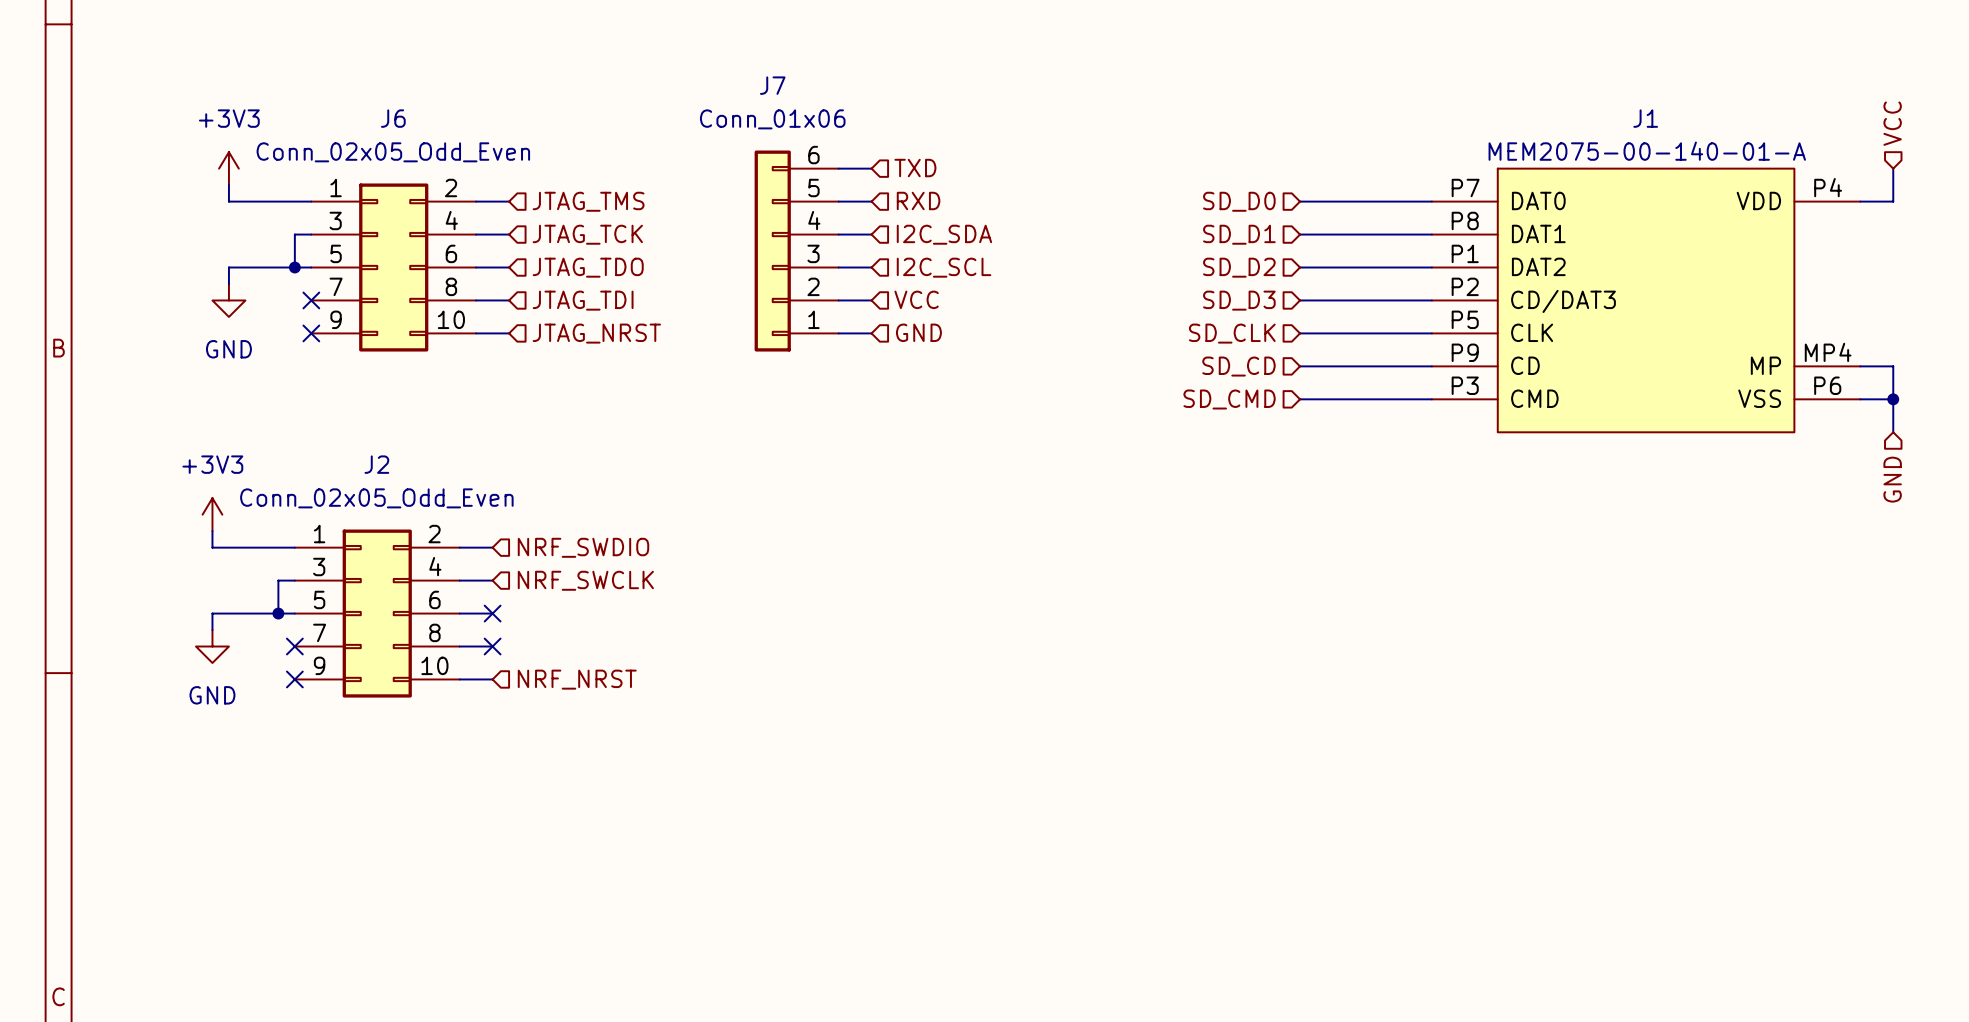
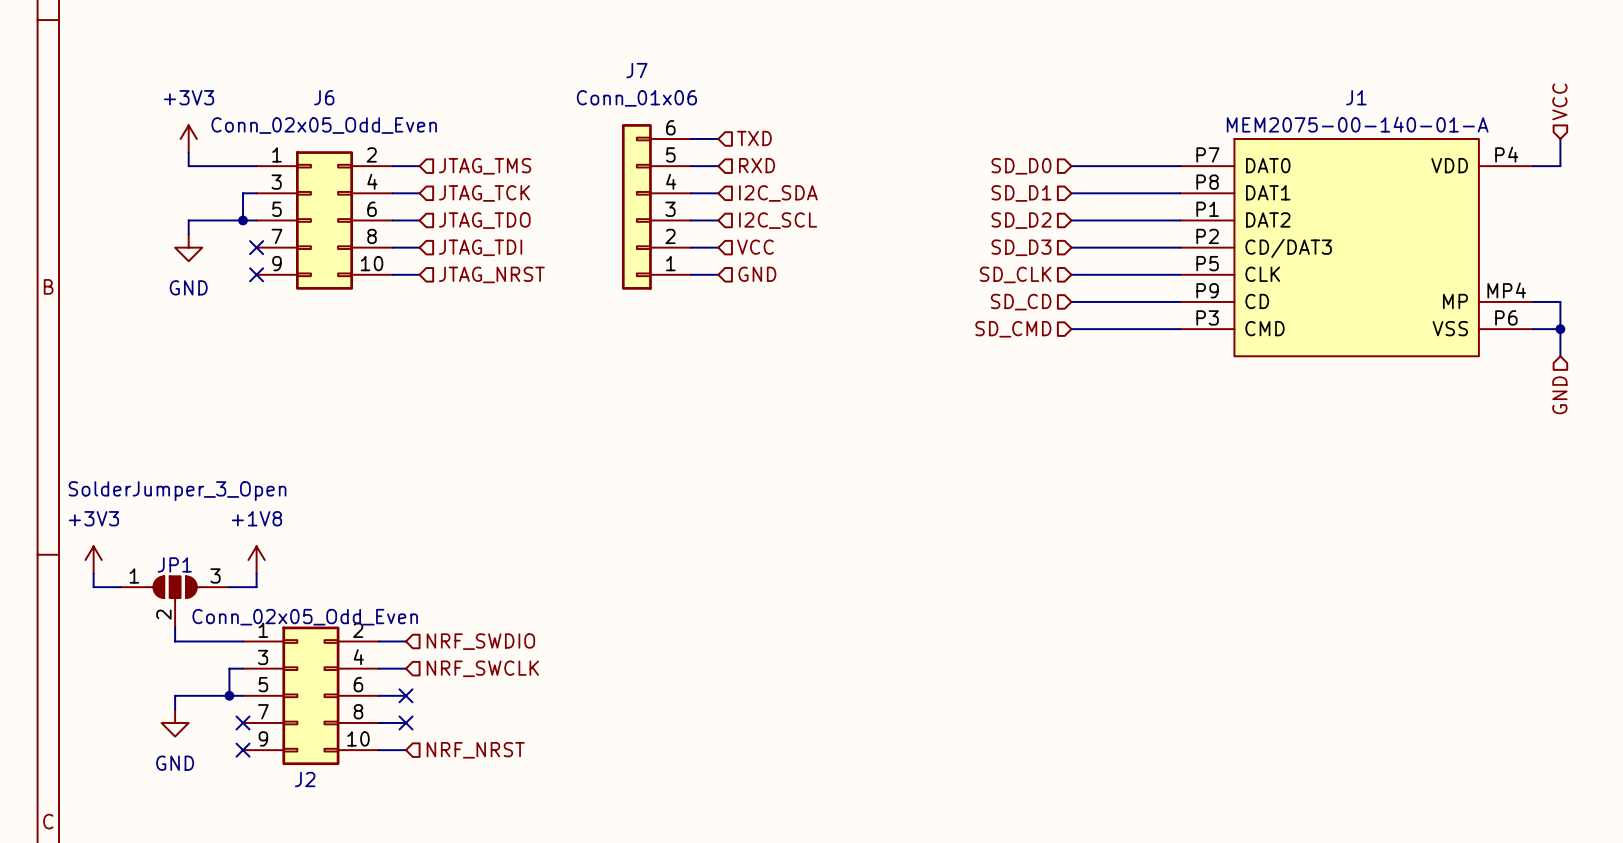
J2 name position: J2 (376, 464) -> J2 (305, 779)
J2 value position: Conn_02x05_Odd_Even (376, 498) -> Conn_02x05_Odd_Even (305, 617)
power symbol position: +3V3 (212, 514) -> +3V3 (93, 560)
wire: (212, 531) (212, 547) (294, 547) -> (175, 627) (175, 641) (243, 641)
wire: (459, 547) (492, 547) -> (378, 641) (406, 641)
hierarchical label position: NRF_SWDIO (583, 547) -> NRF_SWDIO (480, 641)
wire: (294, 580) (278, 580) (278, 613) -> (243, 668) (229, 668) (229, 695)
wire: (459, 580) (492, 580) -> (378, 668) (406, 668)
hierarchical label position: NRF_SWCLK (585, 580) -> NRF_SWCLK (482, 668)
junction: (278, 613) -> none
wire: (294, 613) (212, 613) (212, 630) -> (243, 695) (175, 695) (175, 709)
J2 position: (377, 613) -> (310, 695)
wire: (459, 613) (492, 613) -> (378, 695) (406, 695)
no-connect mark: (492, 613) -> none
power symbol position: GND (212, 646) -> GND (175, 722)
no-connect mark: (294, 646) -> none
wire: (459, 646) (492, 646) -> (378, 722) (406, 722)
no-connect mark: (492, 646) -> none
no-connect mark: (294, 679) -> none
power symbol: none -> +1V8 (256, 560)
wire: (459, 679) (492, 679) -> (378, 750) (406, 750)
hierarchical label position: NRF_NRST (577, 679) -> NRF_NRST (475, 750)
wire: none -> (93, 573) (93, 587) (120, 587)
wire: none -> (256, 573) (256, 587) (229, 587)
JP1: none -> SolderJumper_3_Open (175, 602)
junction: none -> (229, 695)
no-connect mark: none -> (406, 695)
no-connect mark: none -> (243, 722)
no-connect mark: none -> (406, 722)
no-connect mark: none -> (243, 750)

